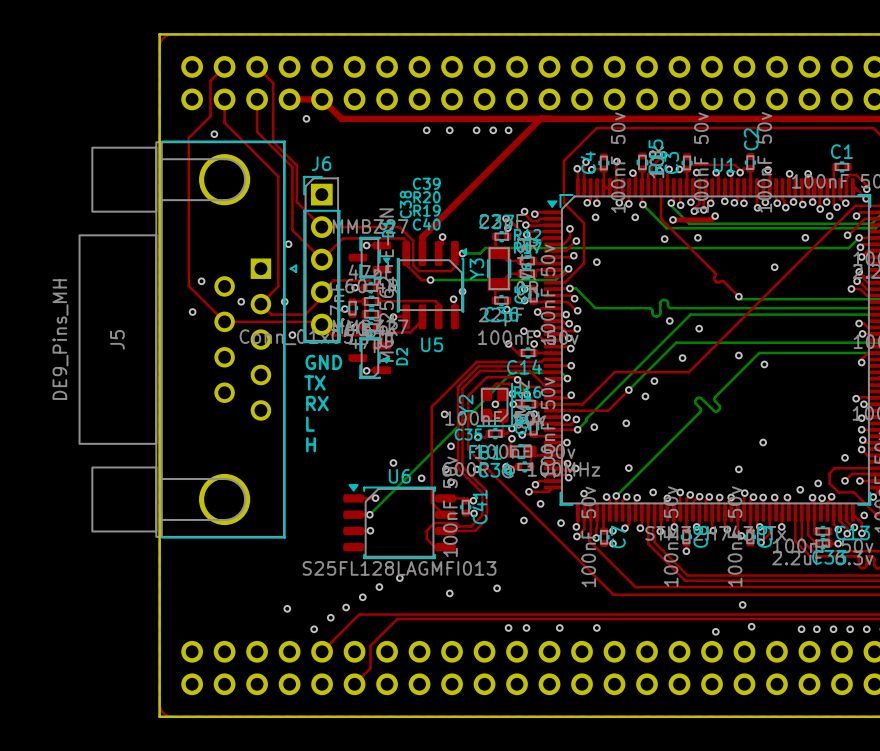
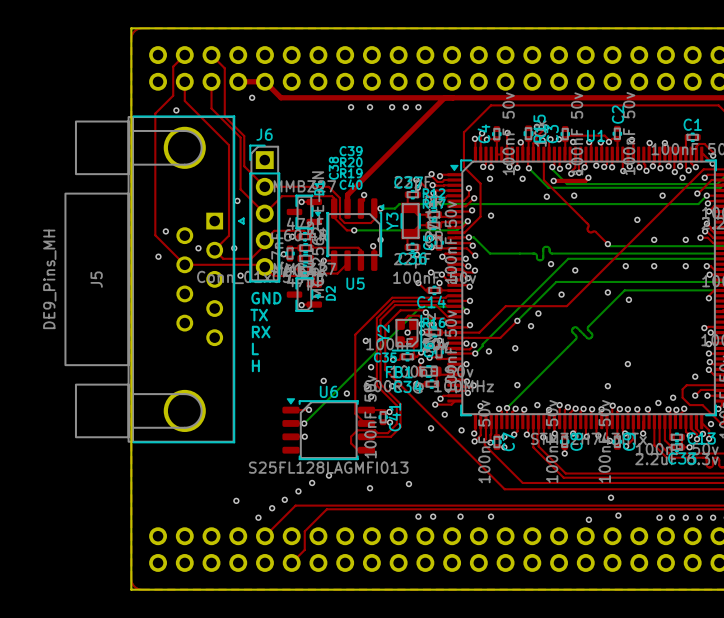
via: none -> (654, 239)
via: none -> (685, 239)
via: none -> (625, 266)
via: none -> (654, 266)
via: none -> (685, 266)

